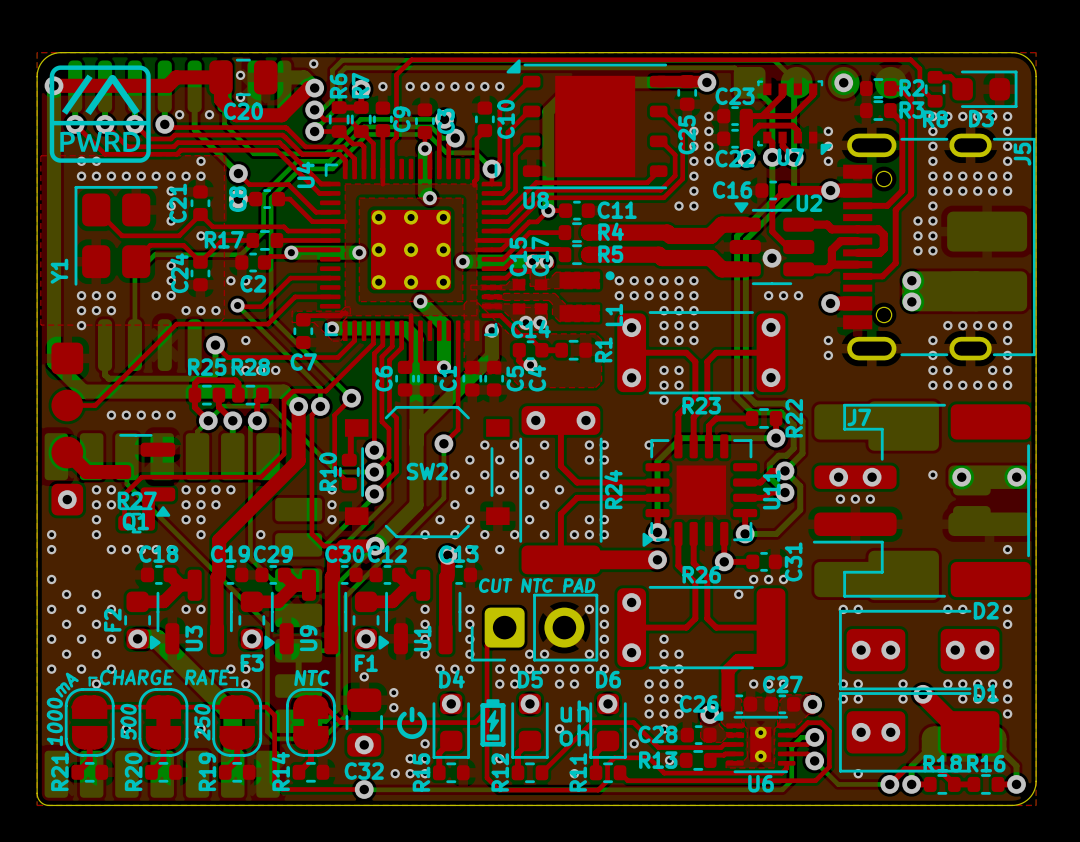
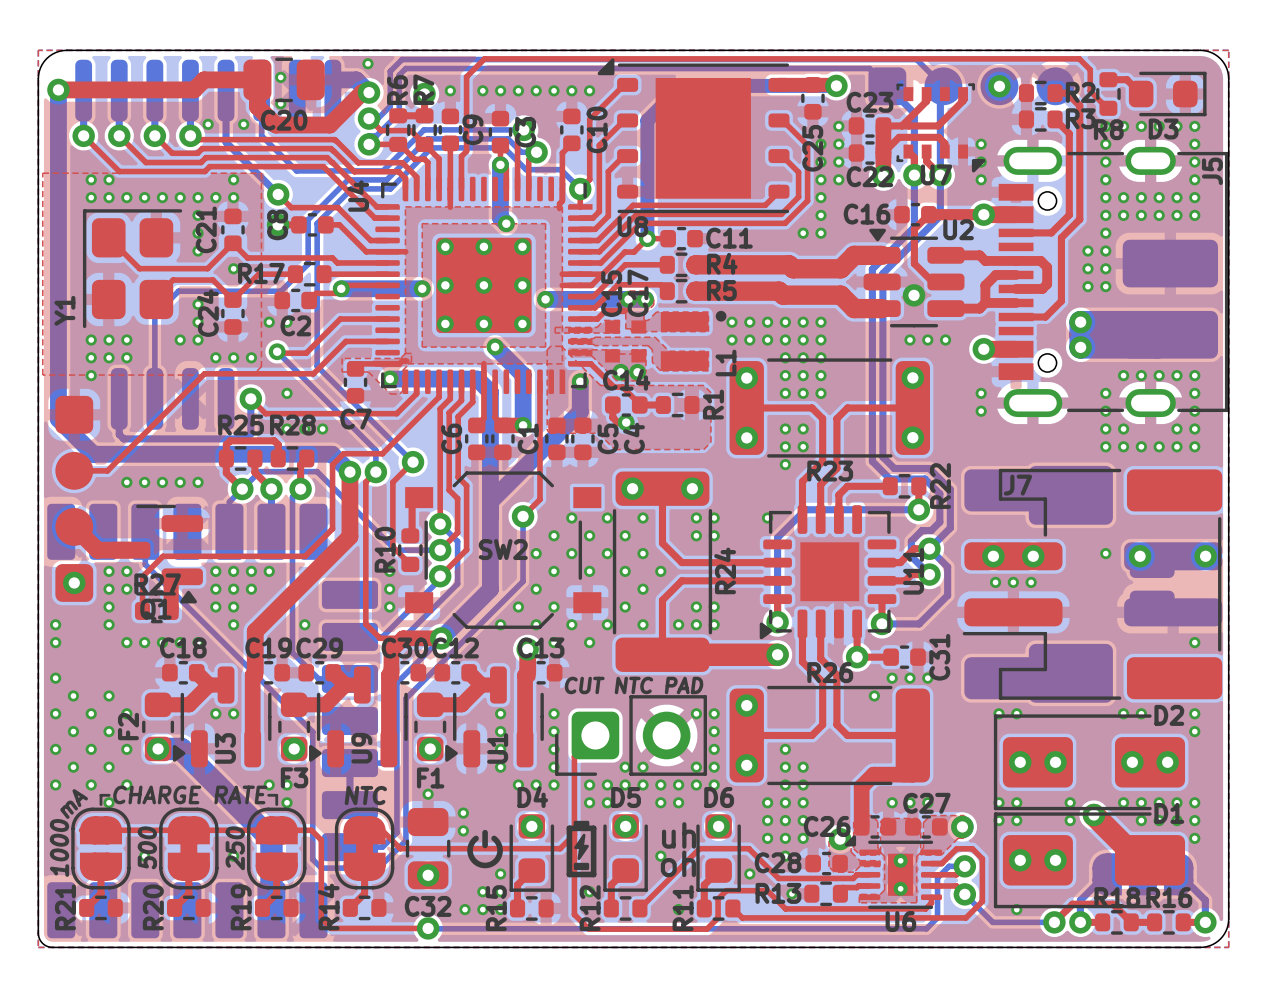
drawing: [49, 65, 151, 163] -> none

